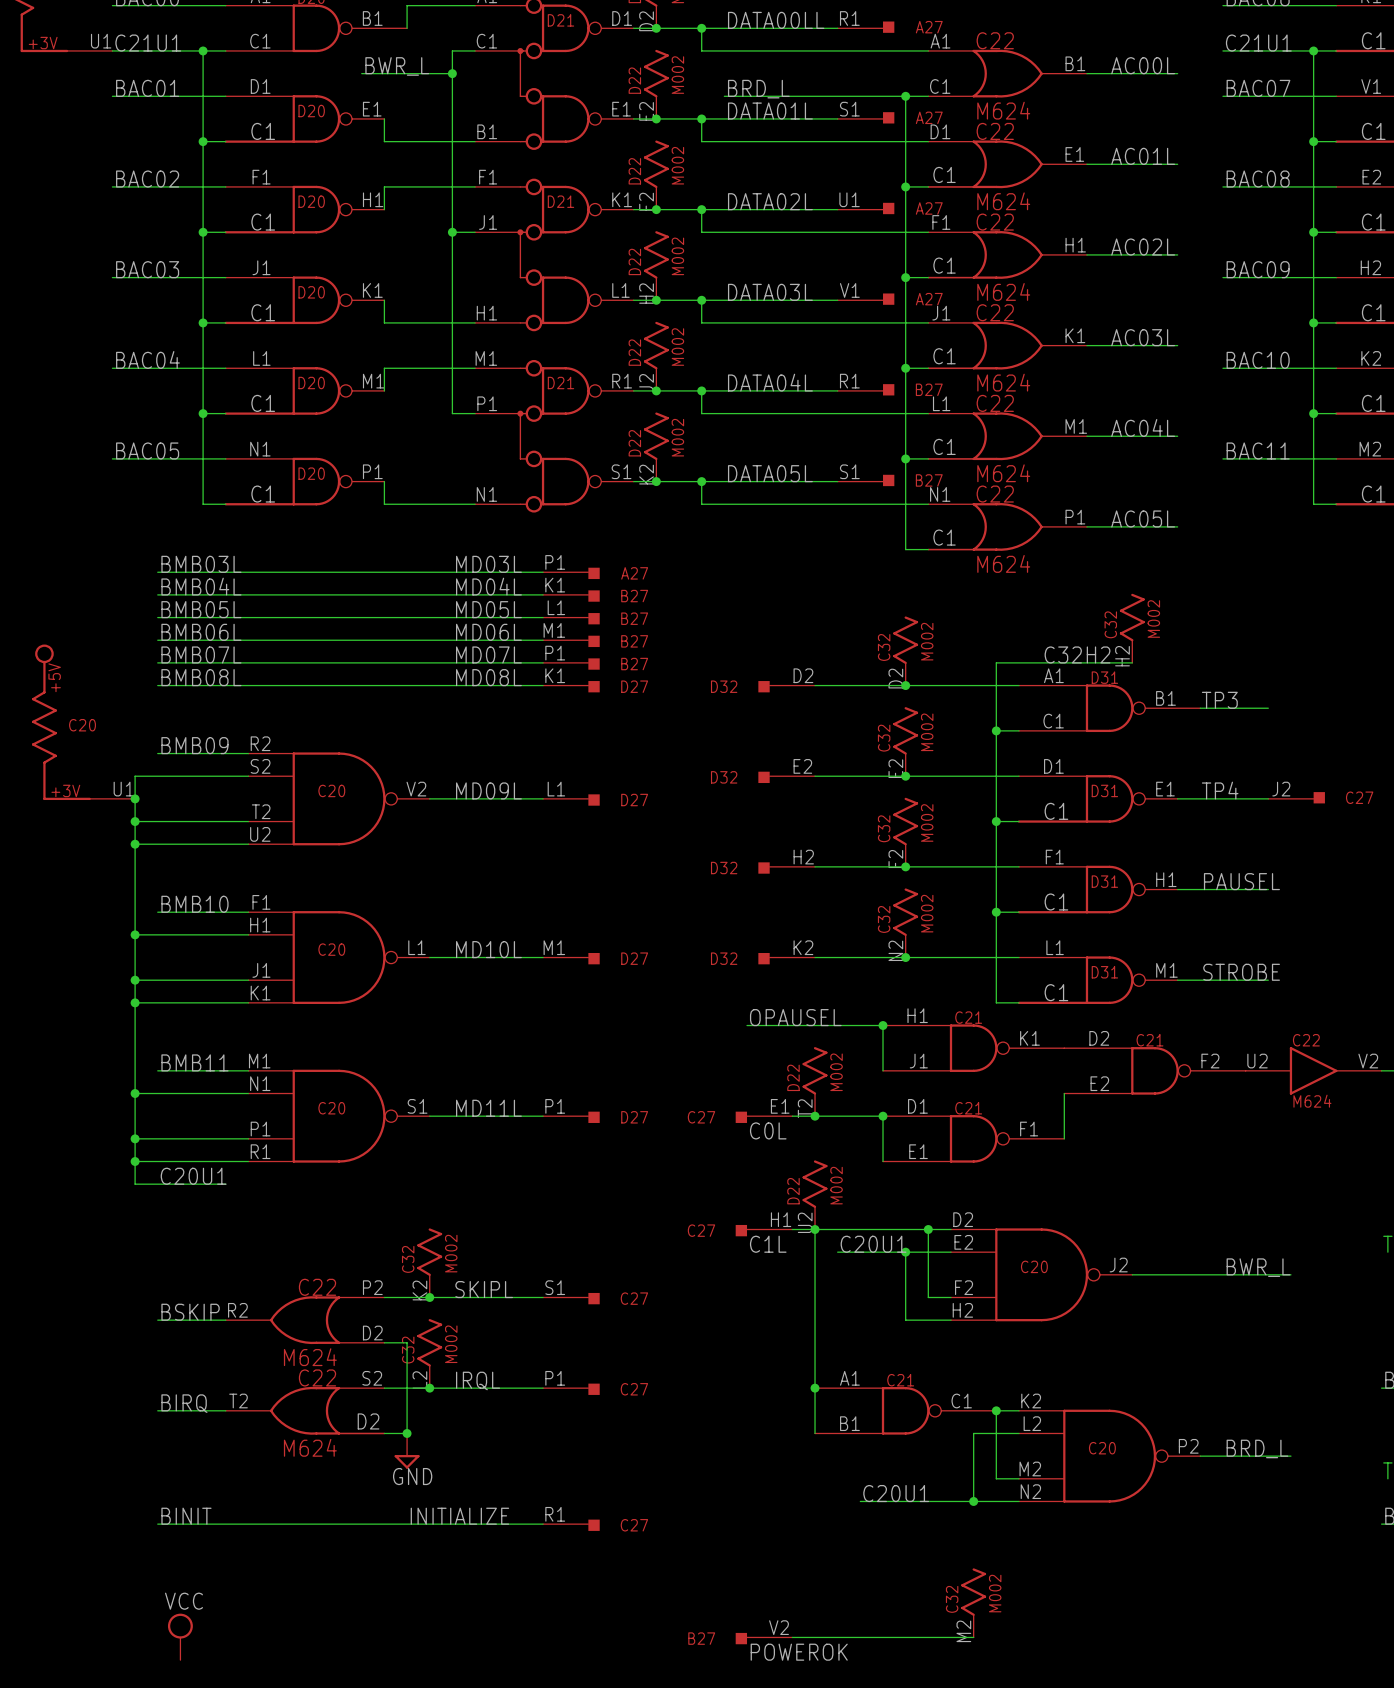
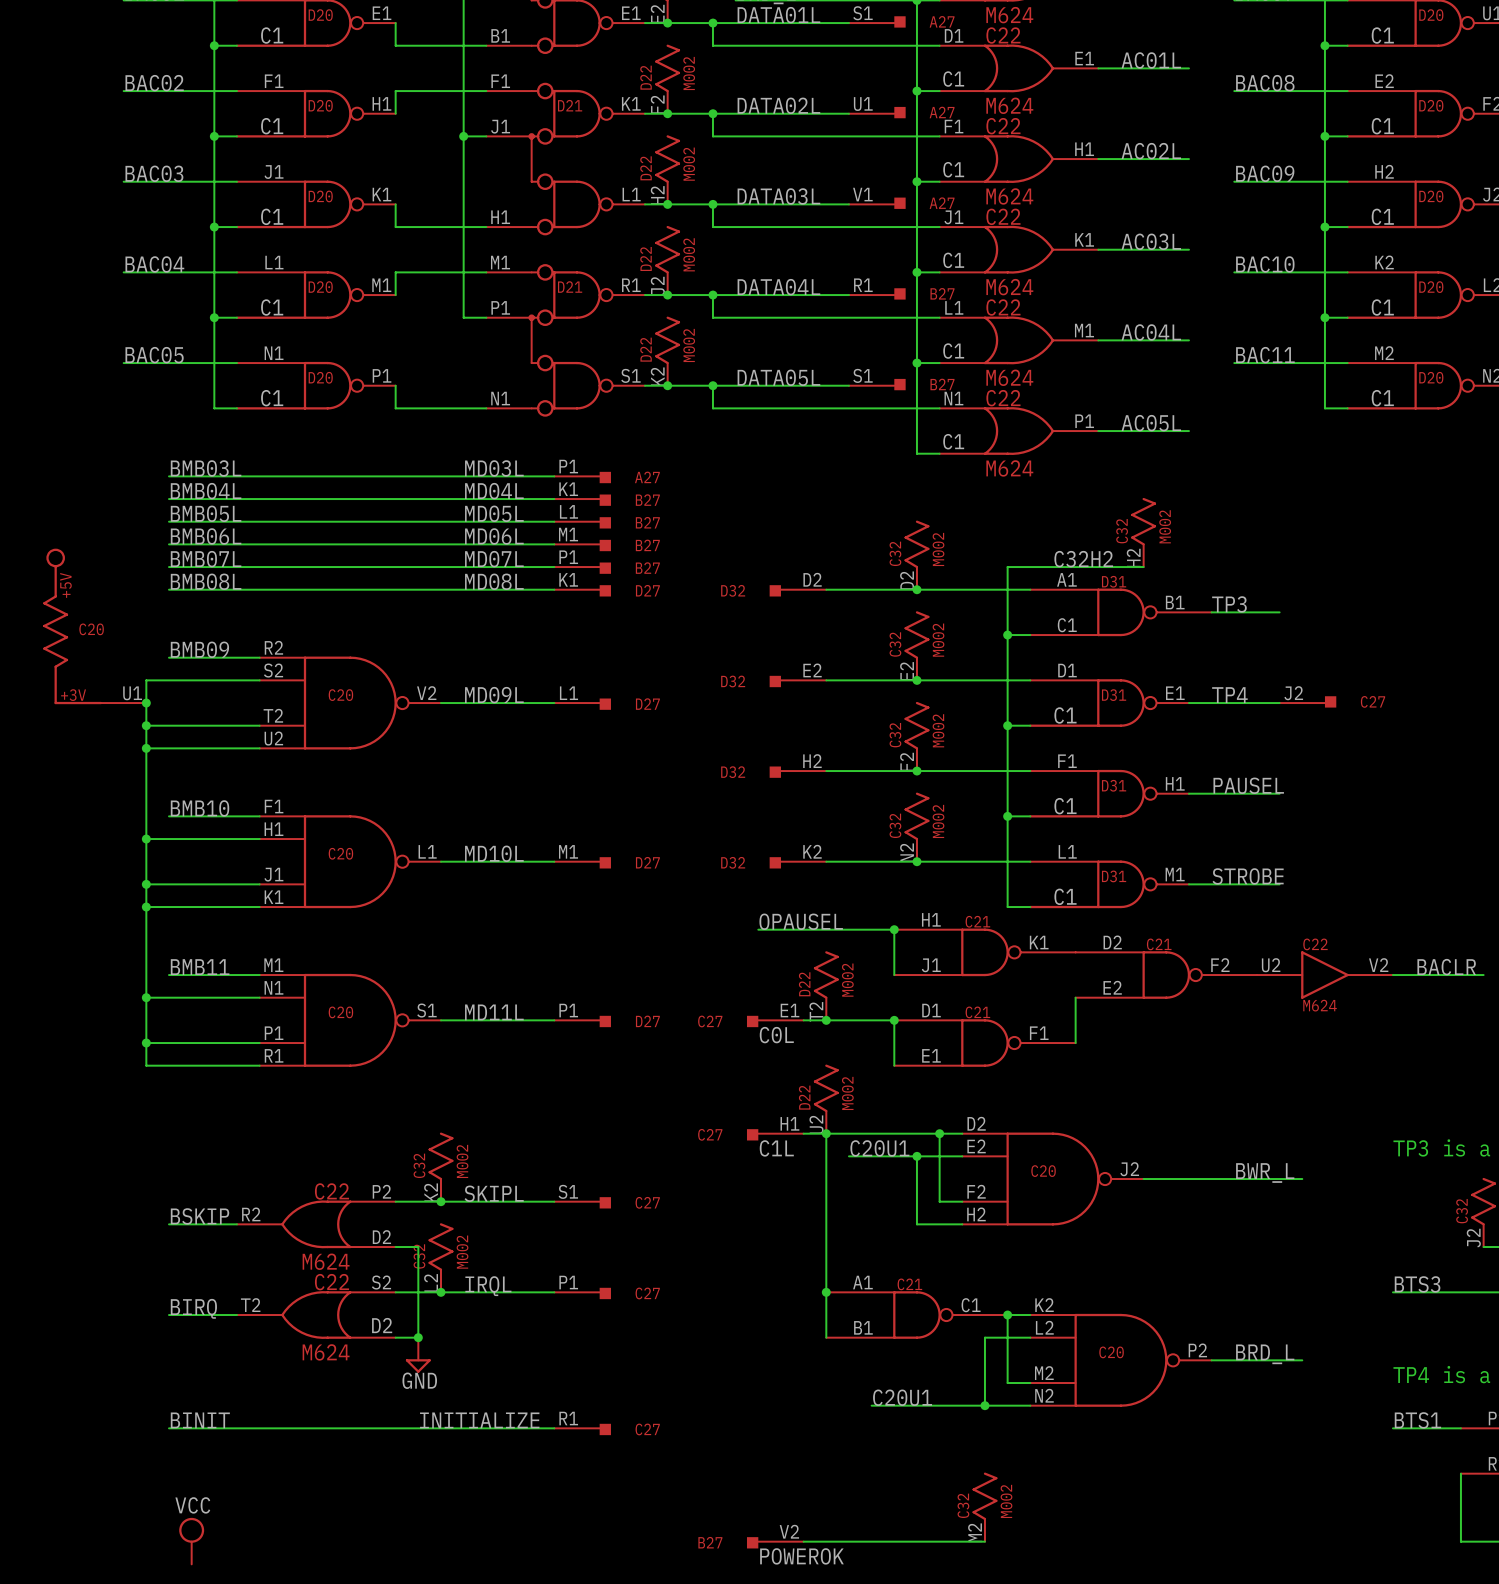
wire: (135, 1161) (135, 1184) (225, 1184) -> none
junction: (135, 1161) -> none
label: C20U1 (193, 1176) -> none

